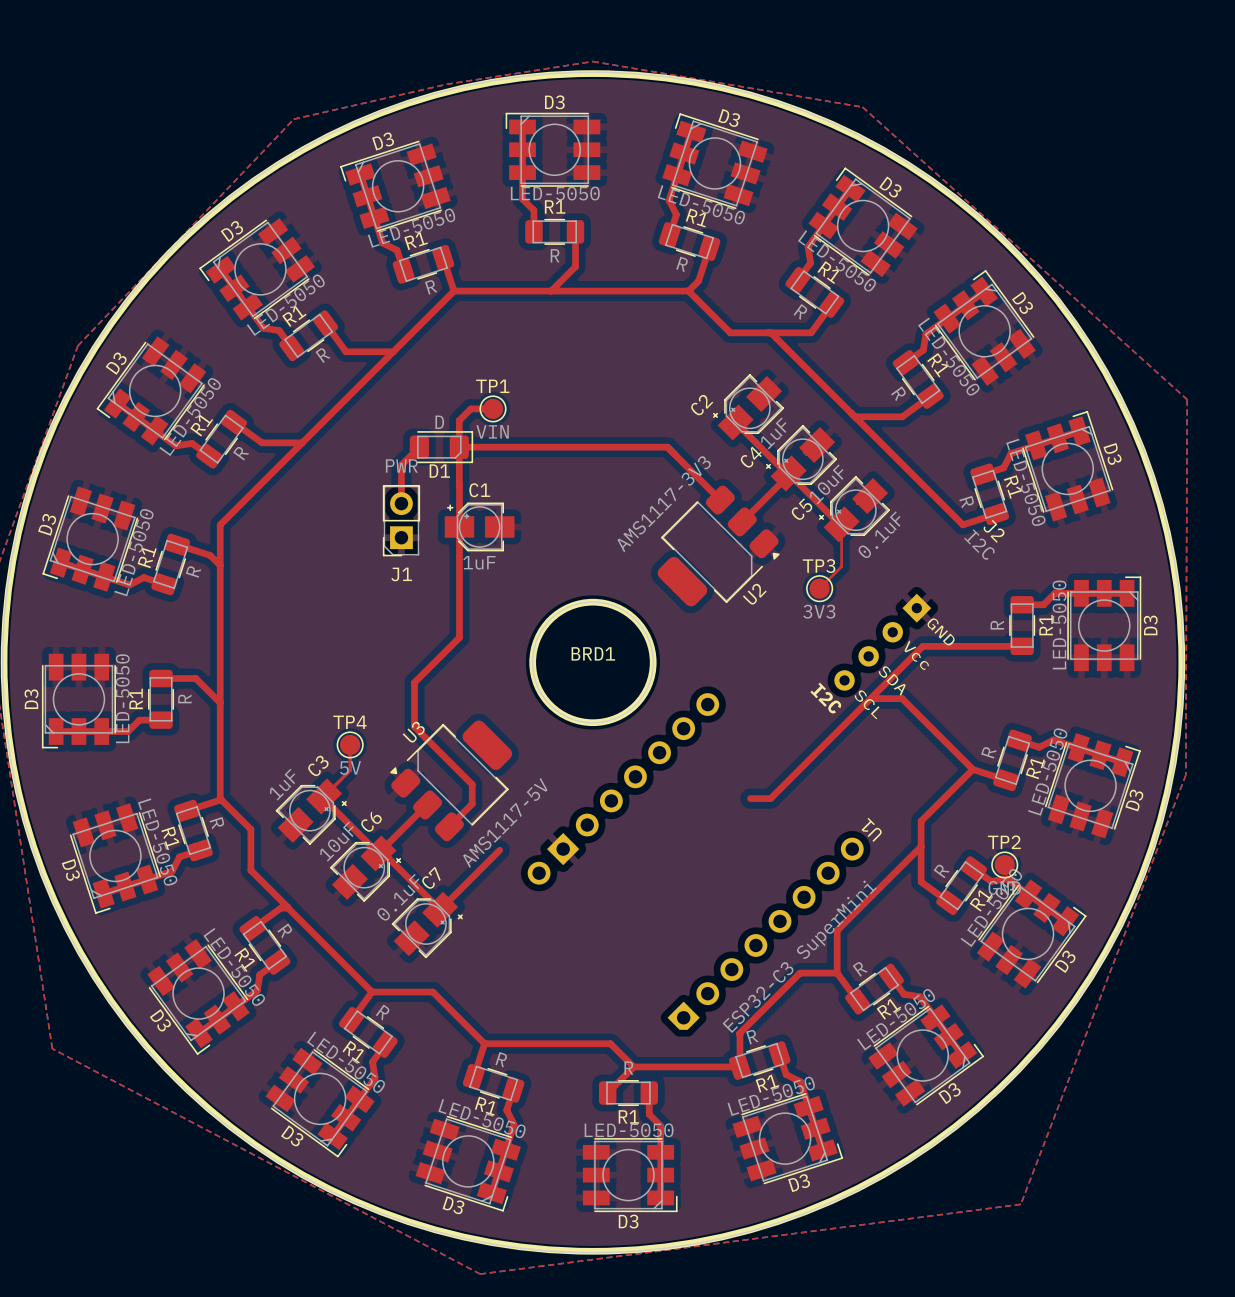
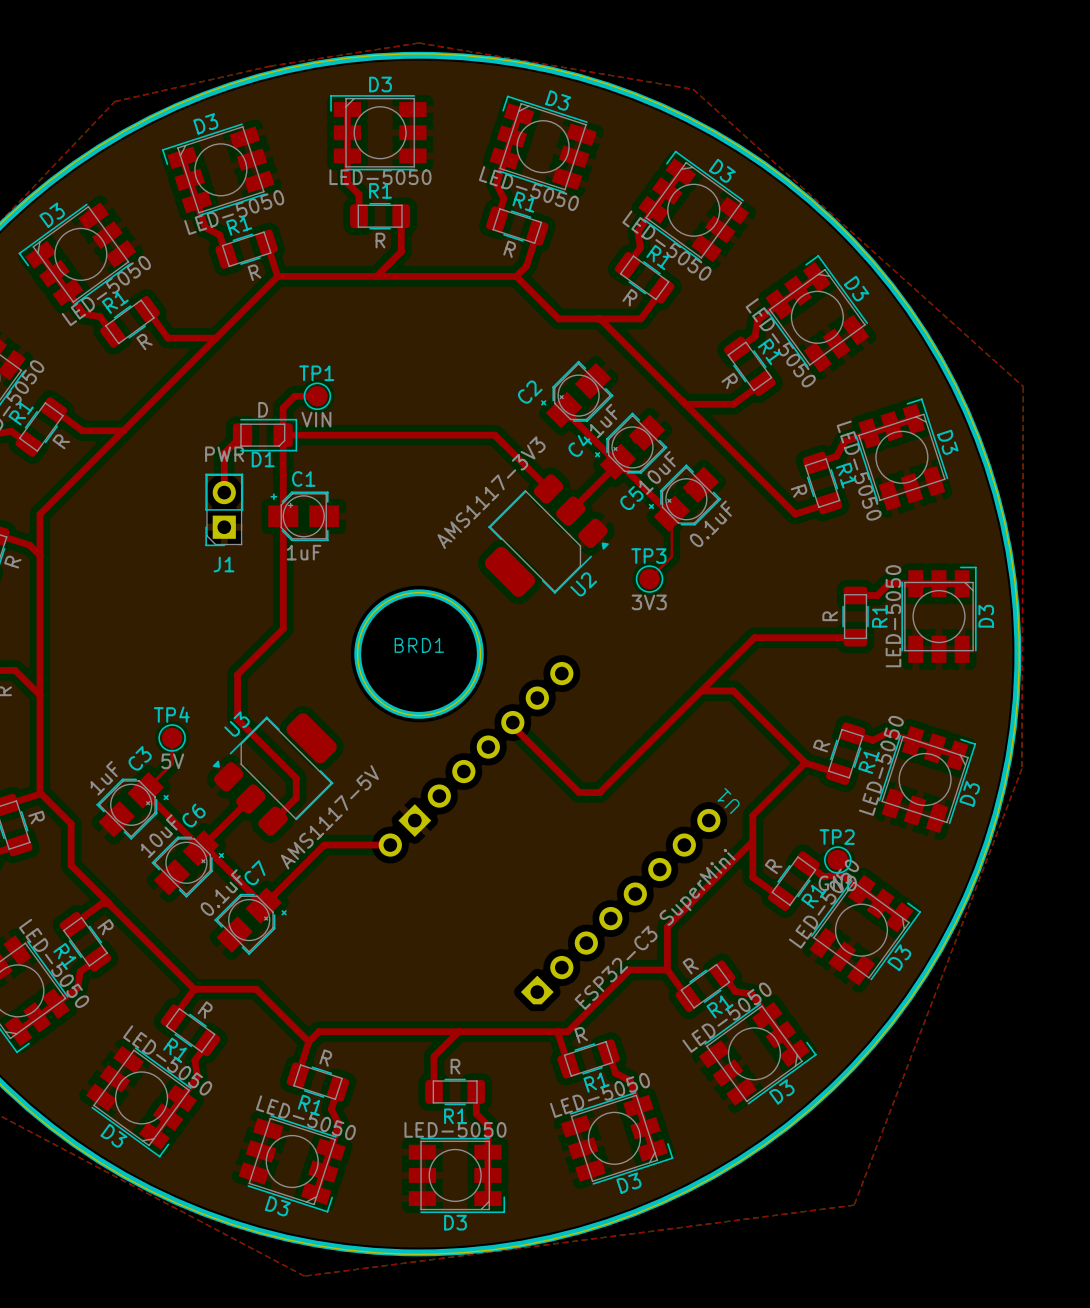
J2: I2C (882, 642) -> none
top track: none -> (511, 725) (579, 792)
top track: none -> (324, 845) (390, 845)
U1 position: (695, 861) -> (549, 833)
top track: none -> (557, 1031) (568, 1065)
top track: (739, 1033) (739, 1066) (633, 1066) -> none
top track: (484, 1043) (610, 1043) (633, 1066) -> (308, 1041) (318, 1031) (567, 1031)
top track: (633, 1066) (607, 1093) -> (458, 1031) (434, 1056) (434, 1091)

